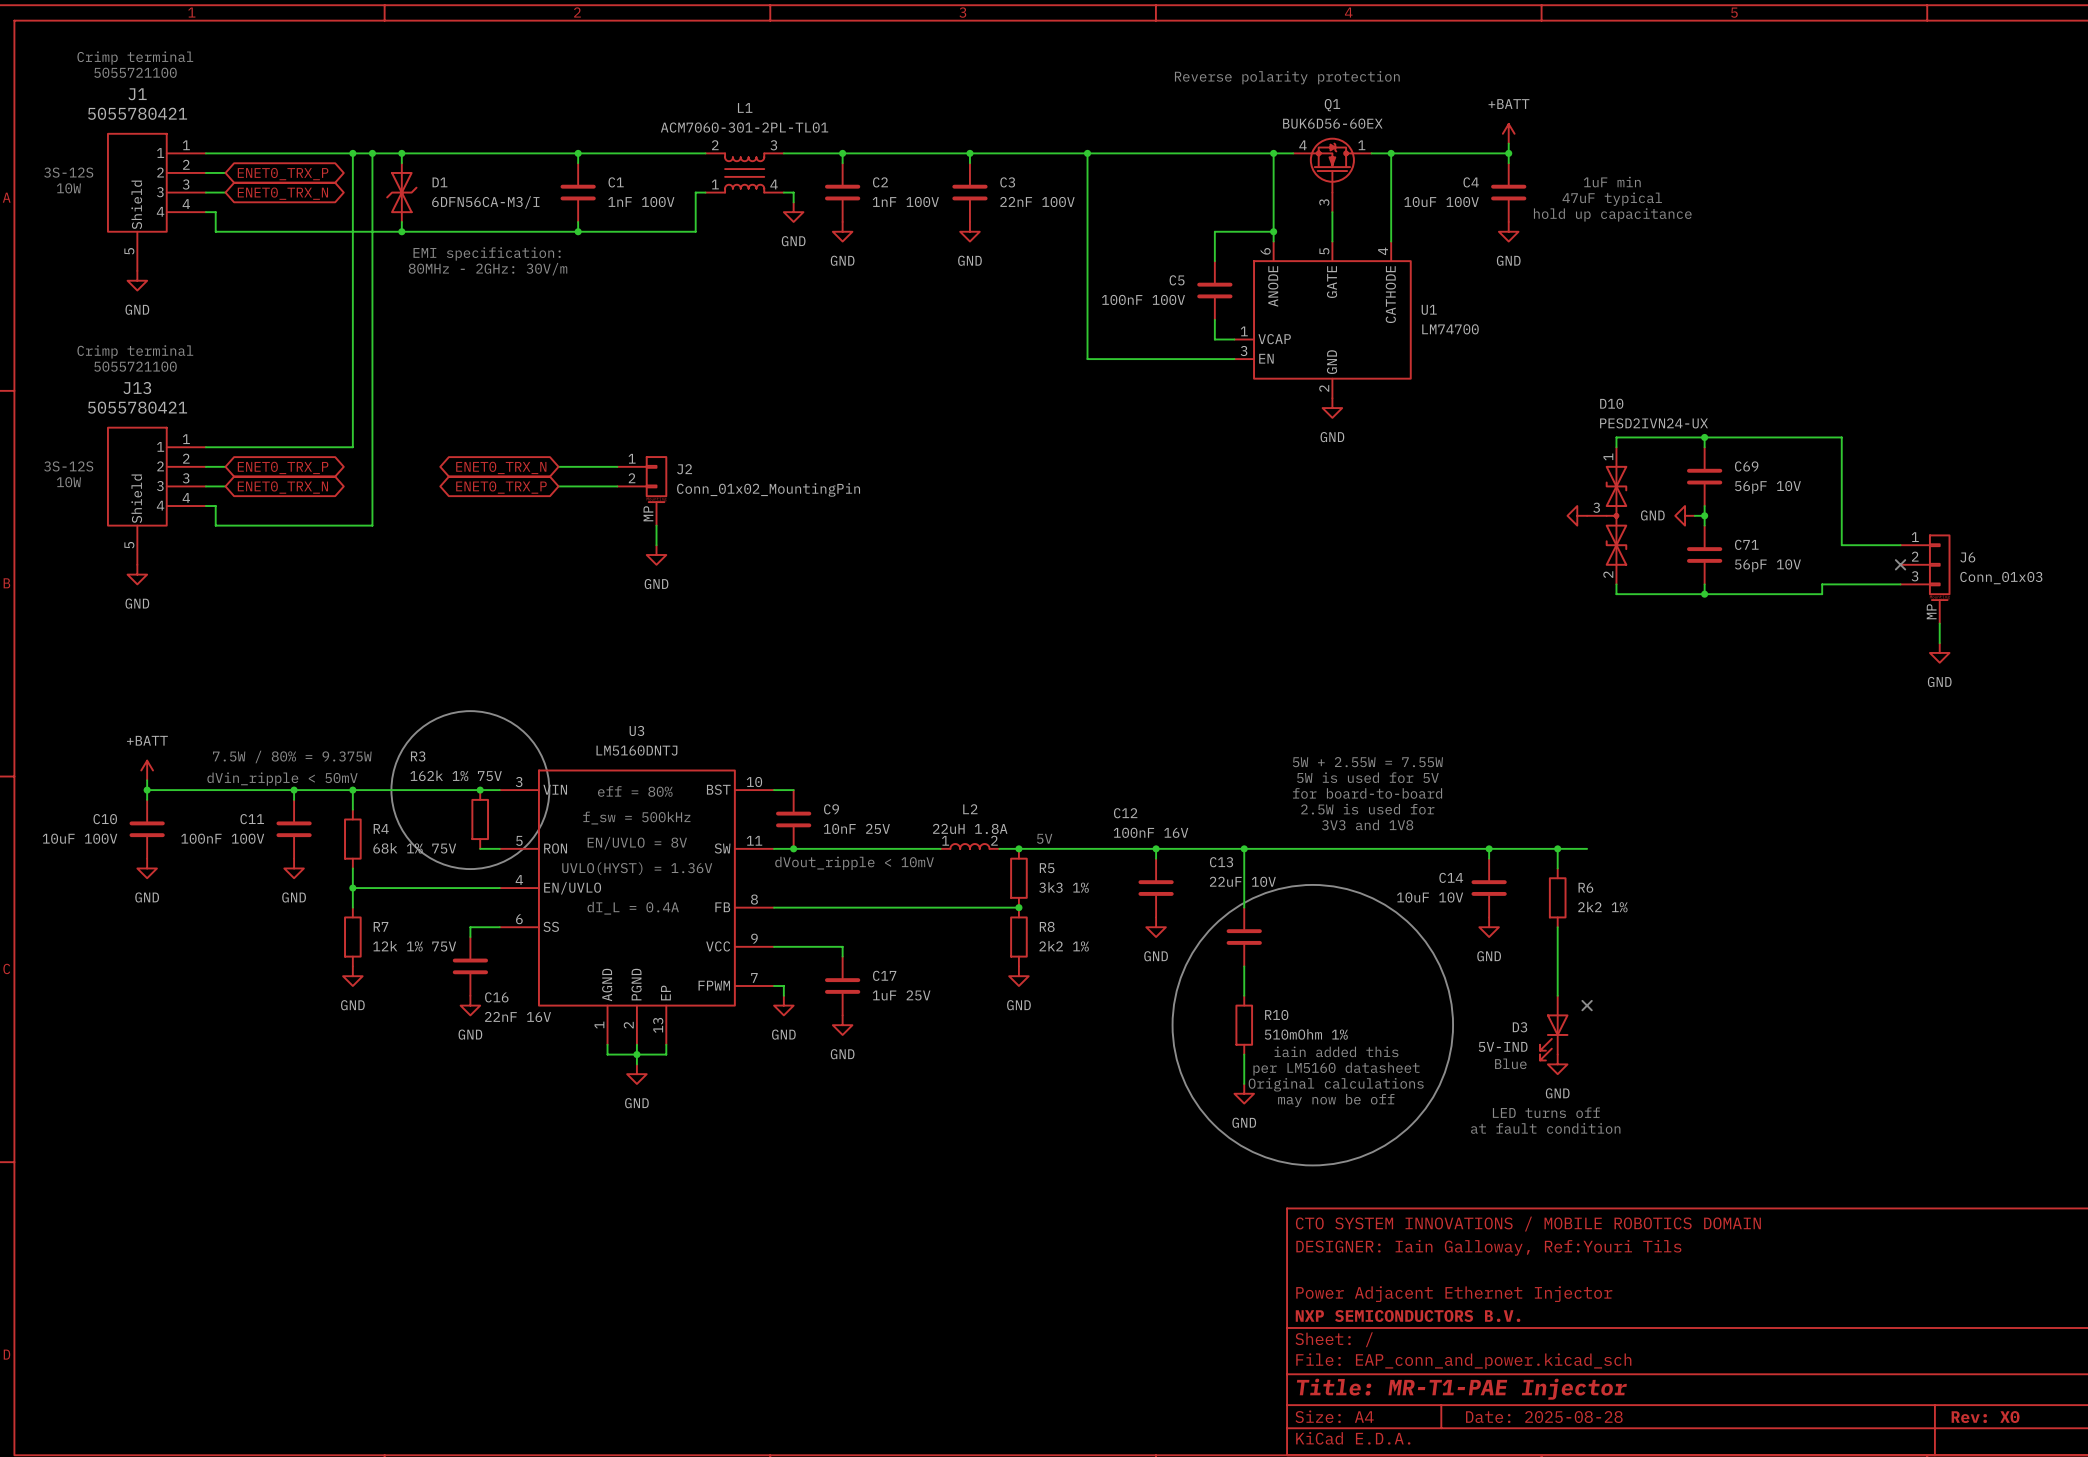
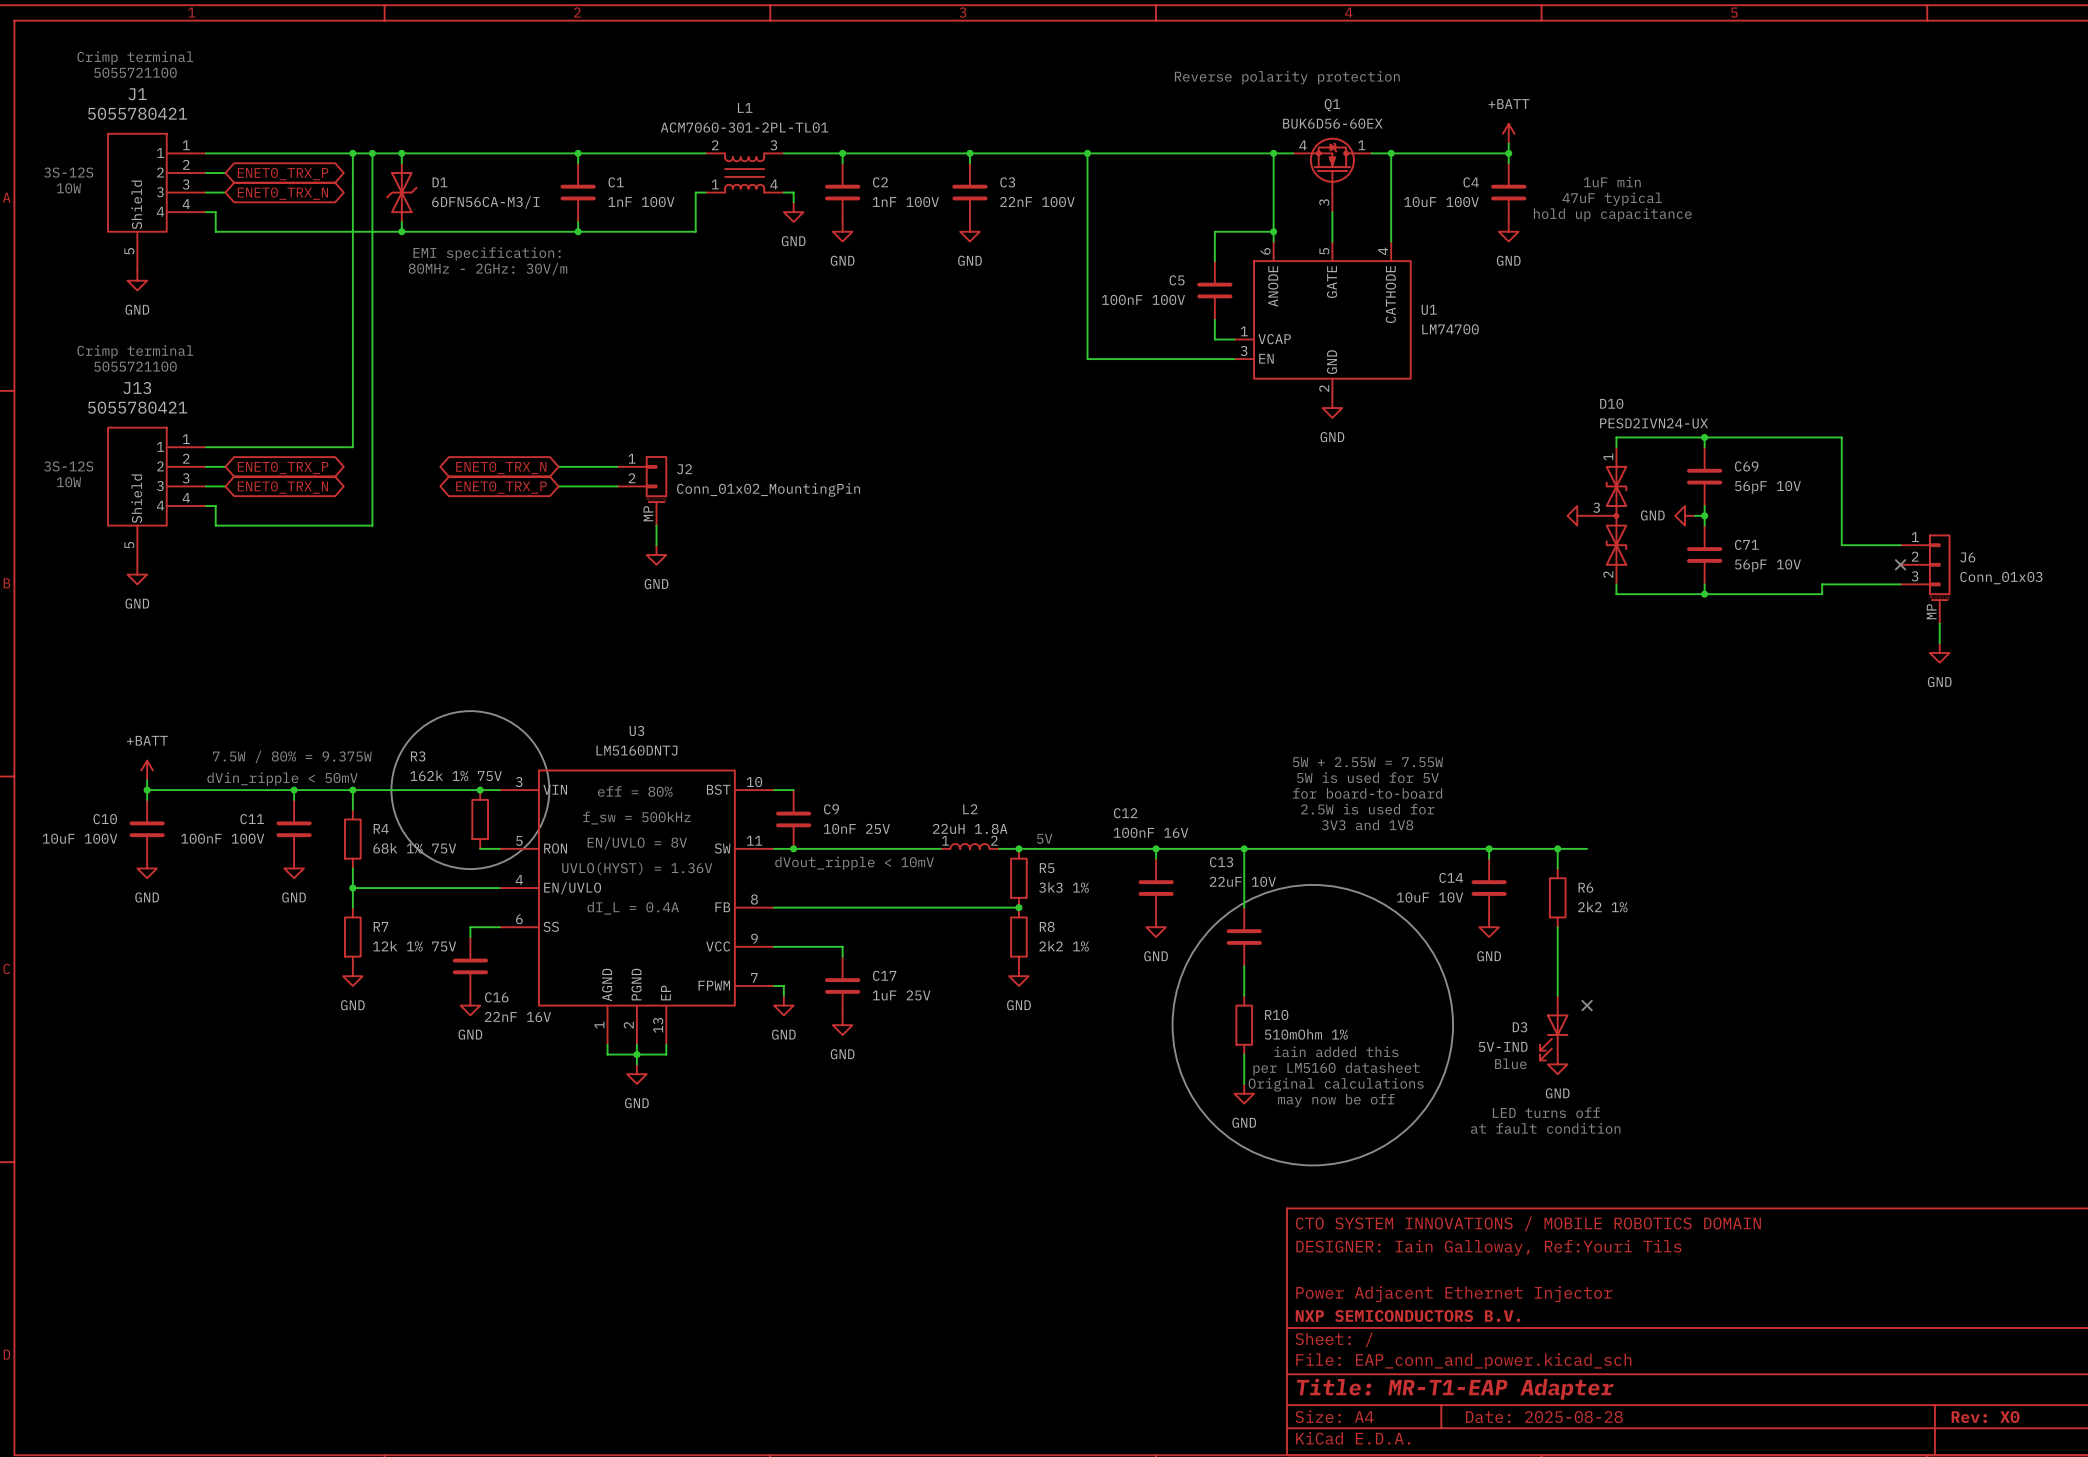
title block: Title: MR-T1-PAE Injector (1461, 1389) -> Title: MR-T1-EAP Adapter (1455, 1389)

